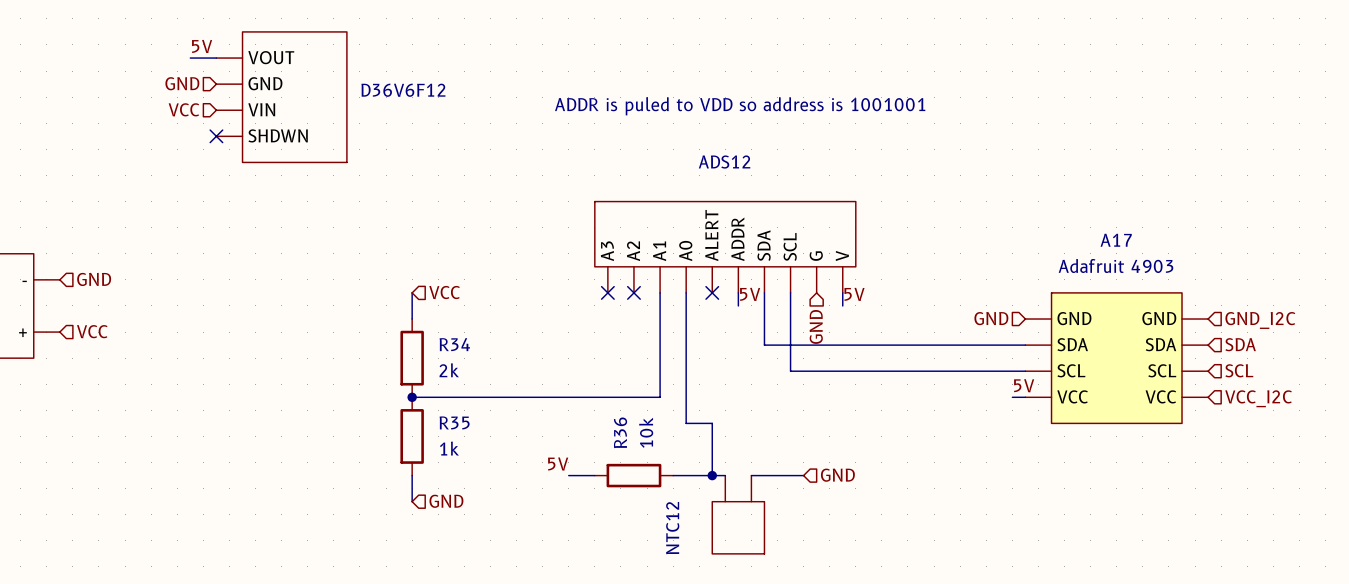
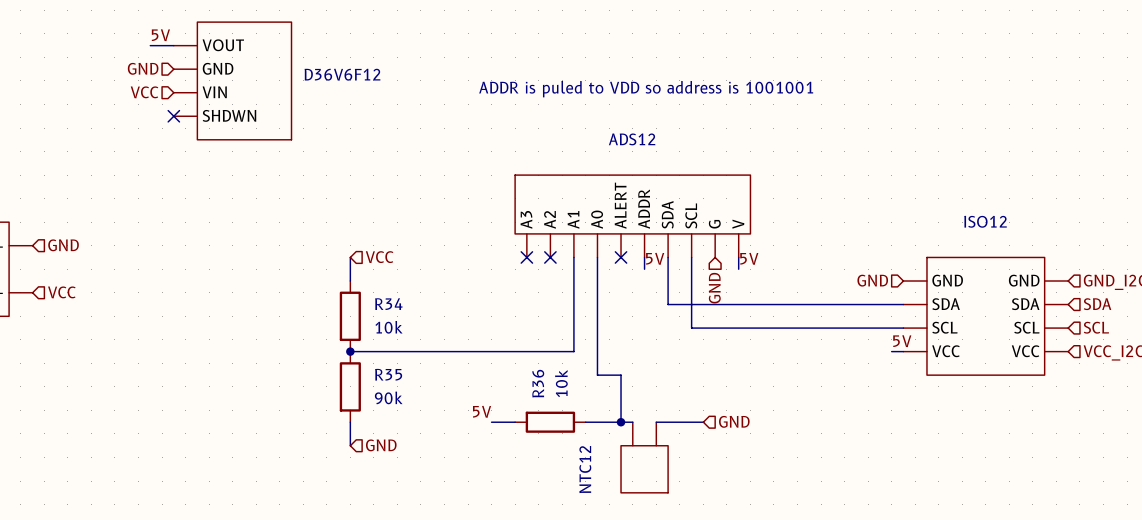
A17: Adafruit 4903 (1116, 358) -> none
ISO12: none -> (985, 316)
R34 value: 2k (449, 370) -> 10k (388, 327)
R35 value: 1k (449, 448) -> 90k (388, 397)

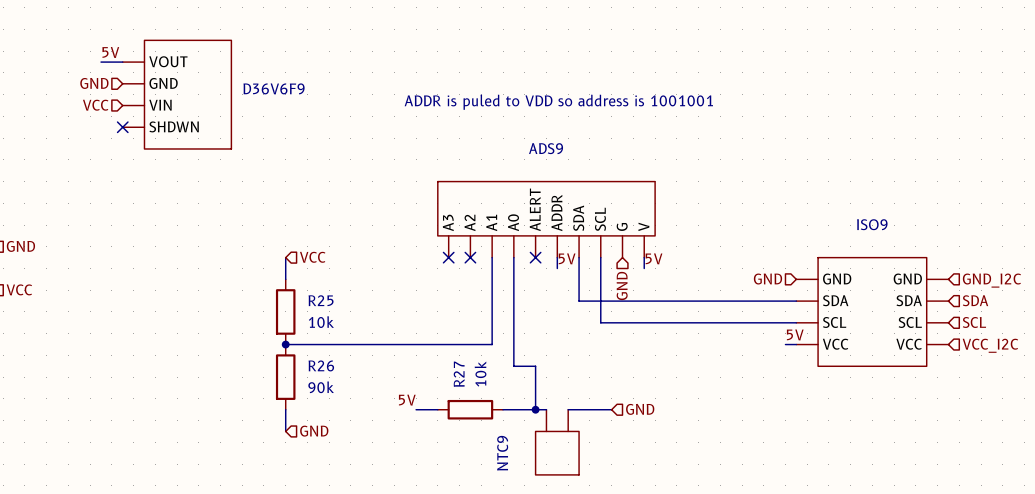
D36V6F12 name: D36V6F12 (342, 74) -> D36V6F9 (274, 88)
ADS12 name: ADS12 (632, 139) -> ADS9 (546, 148)
ISO12 name: ISO12 (985, 221) -> ISO9 (872, 224)
R34 name: R34 (388, 304) -> R25 (321, 300)
R35 name: R35 (388, 374) -> R26 (321, 365)
R36 name: R36 (538, 383) -> R27 (459, 374)
NTC12 name: NTC12 (585, 469) -> NTC9 (502, 453)

